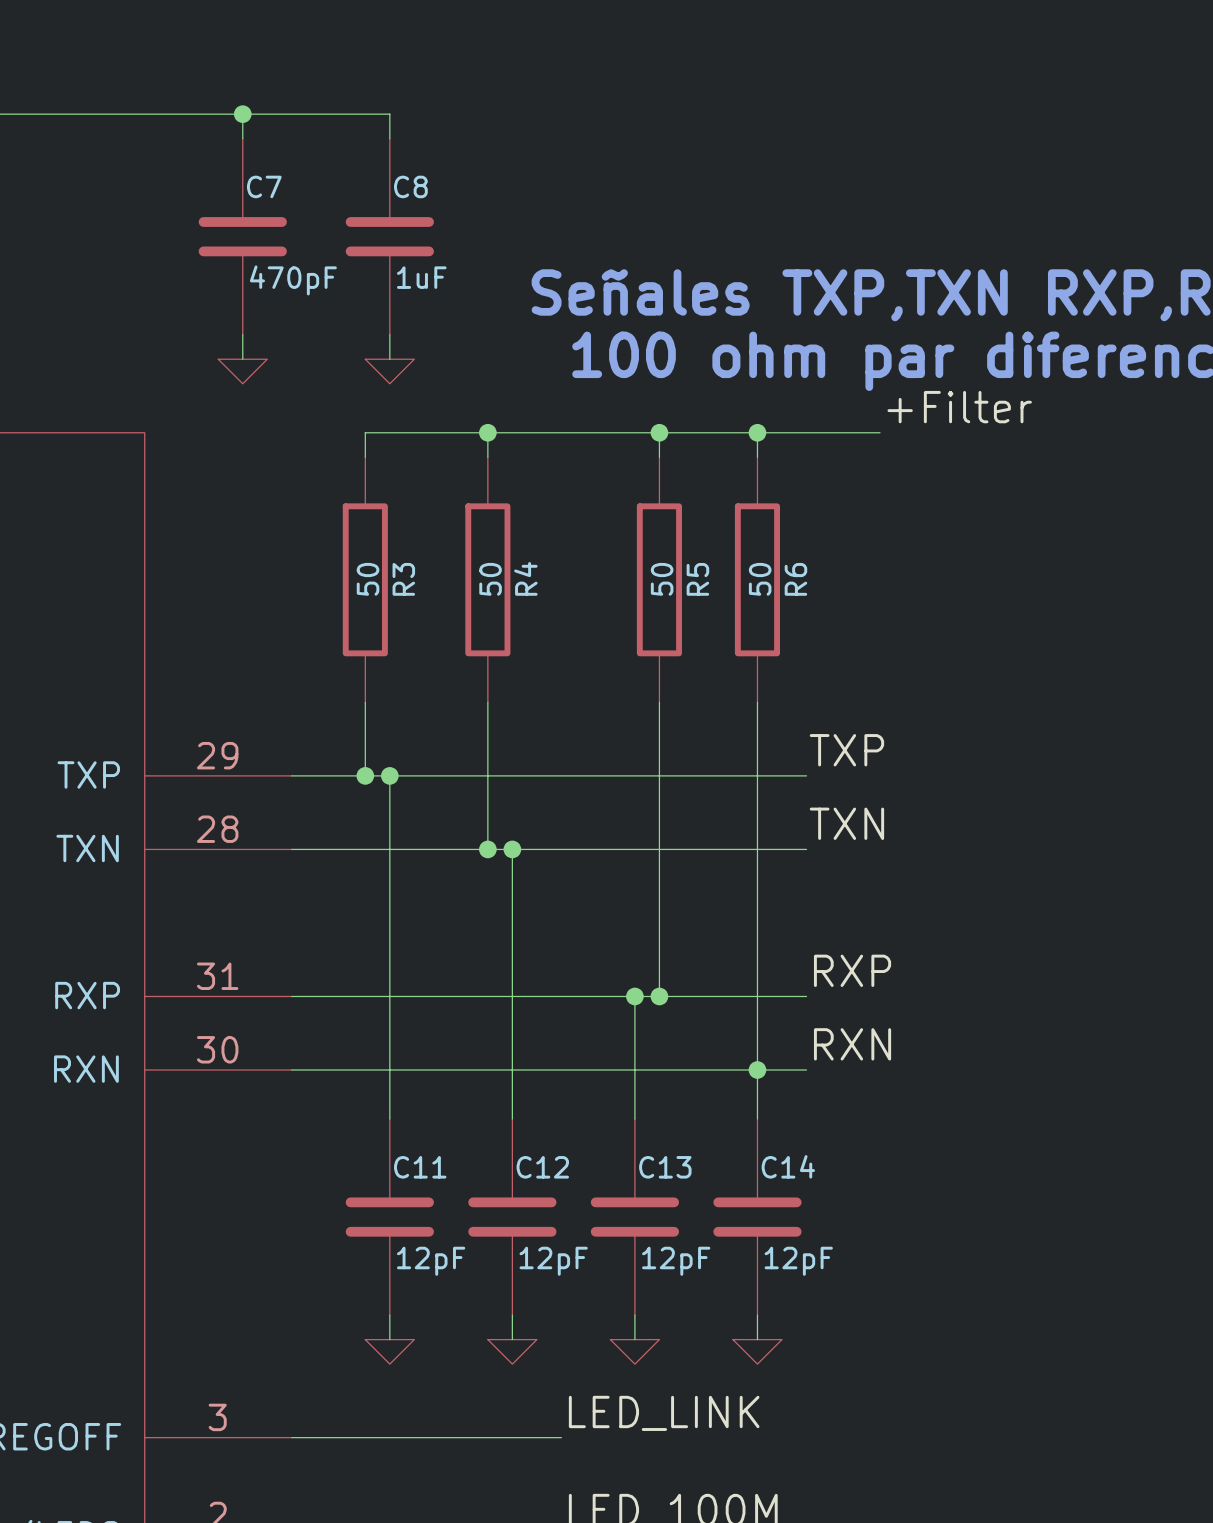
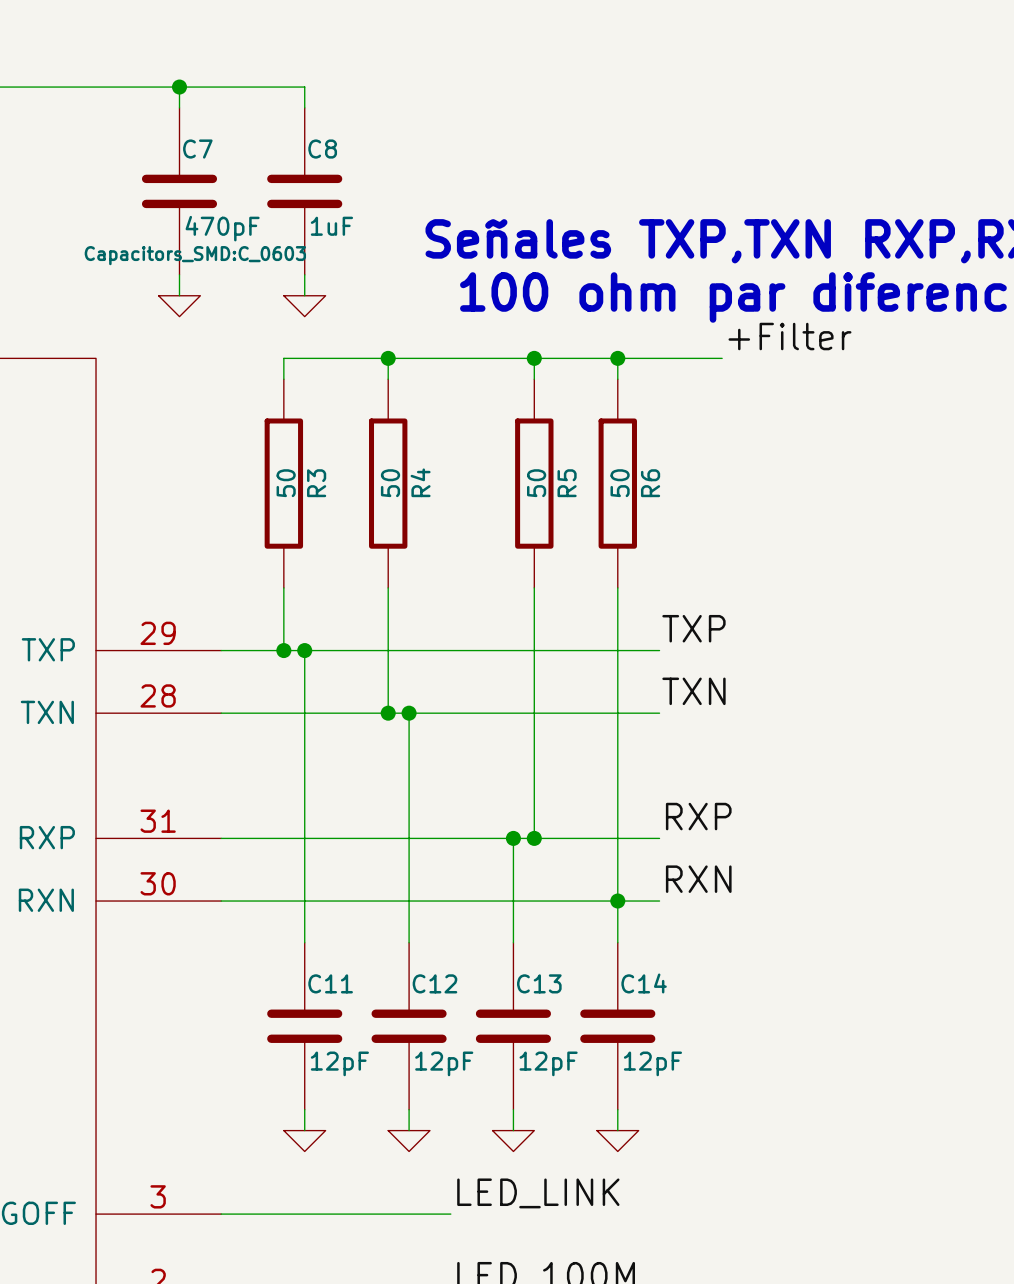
C7 text: none -> Capacitors_SMD:C_0603 (195, 255)

